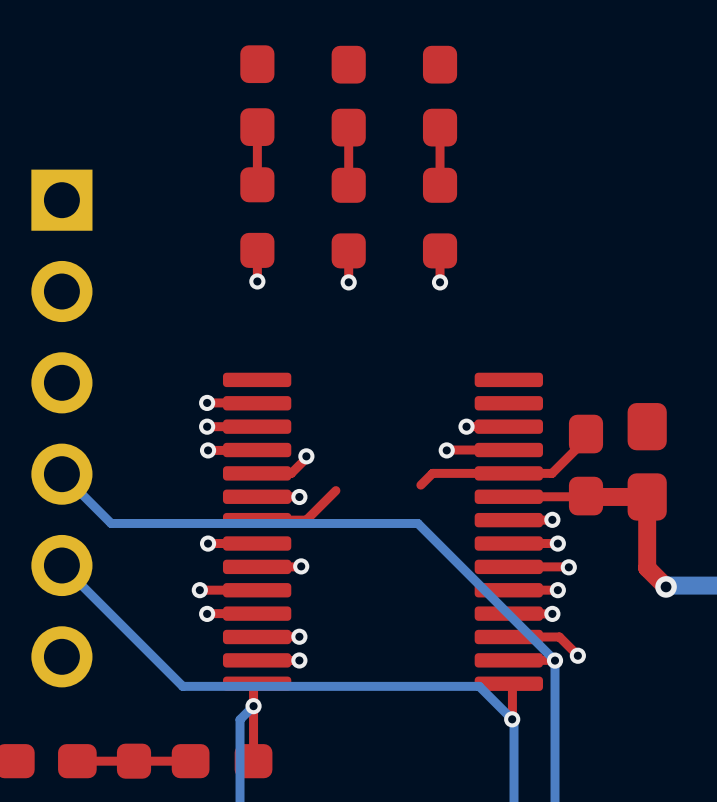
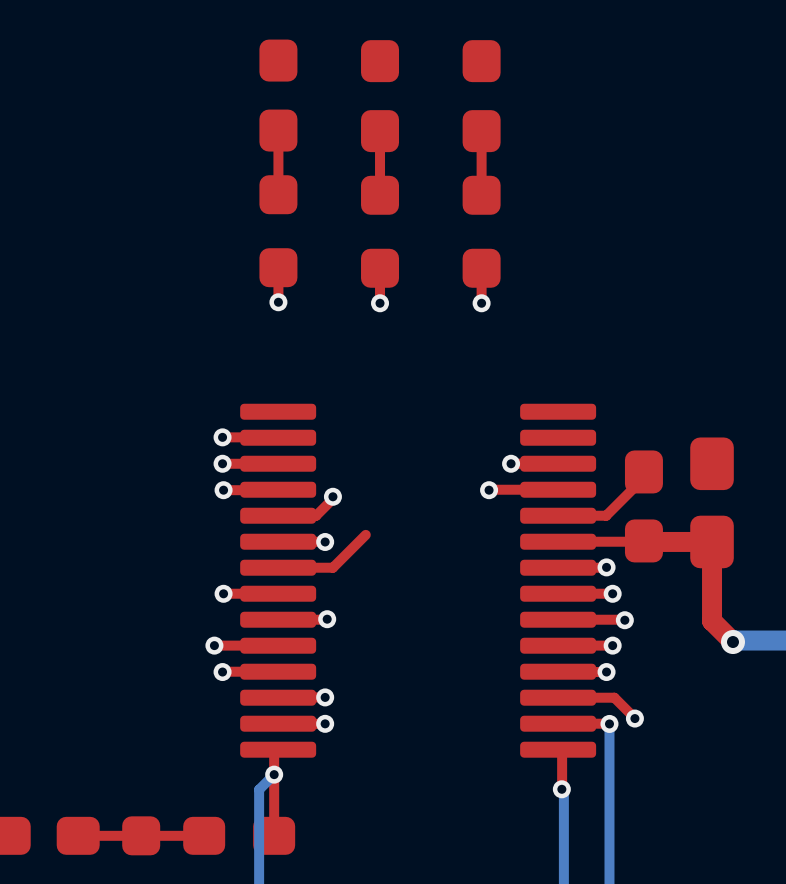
part: (61, 428) -> none
top track: (508, 473) (432, 473) (420, 485) -> none
bottom track: (61, 474) (111, 523) (417, 523) (555, 660) -> none
bottom track: (61, 565) (182, 686) (479, 686) (512, 719) -> none

